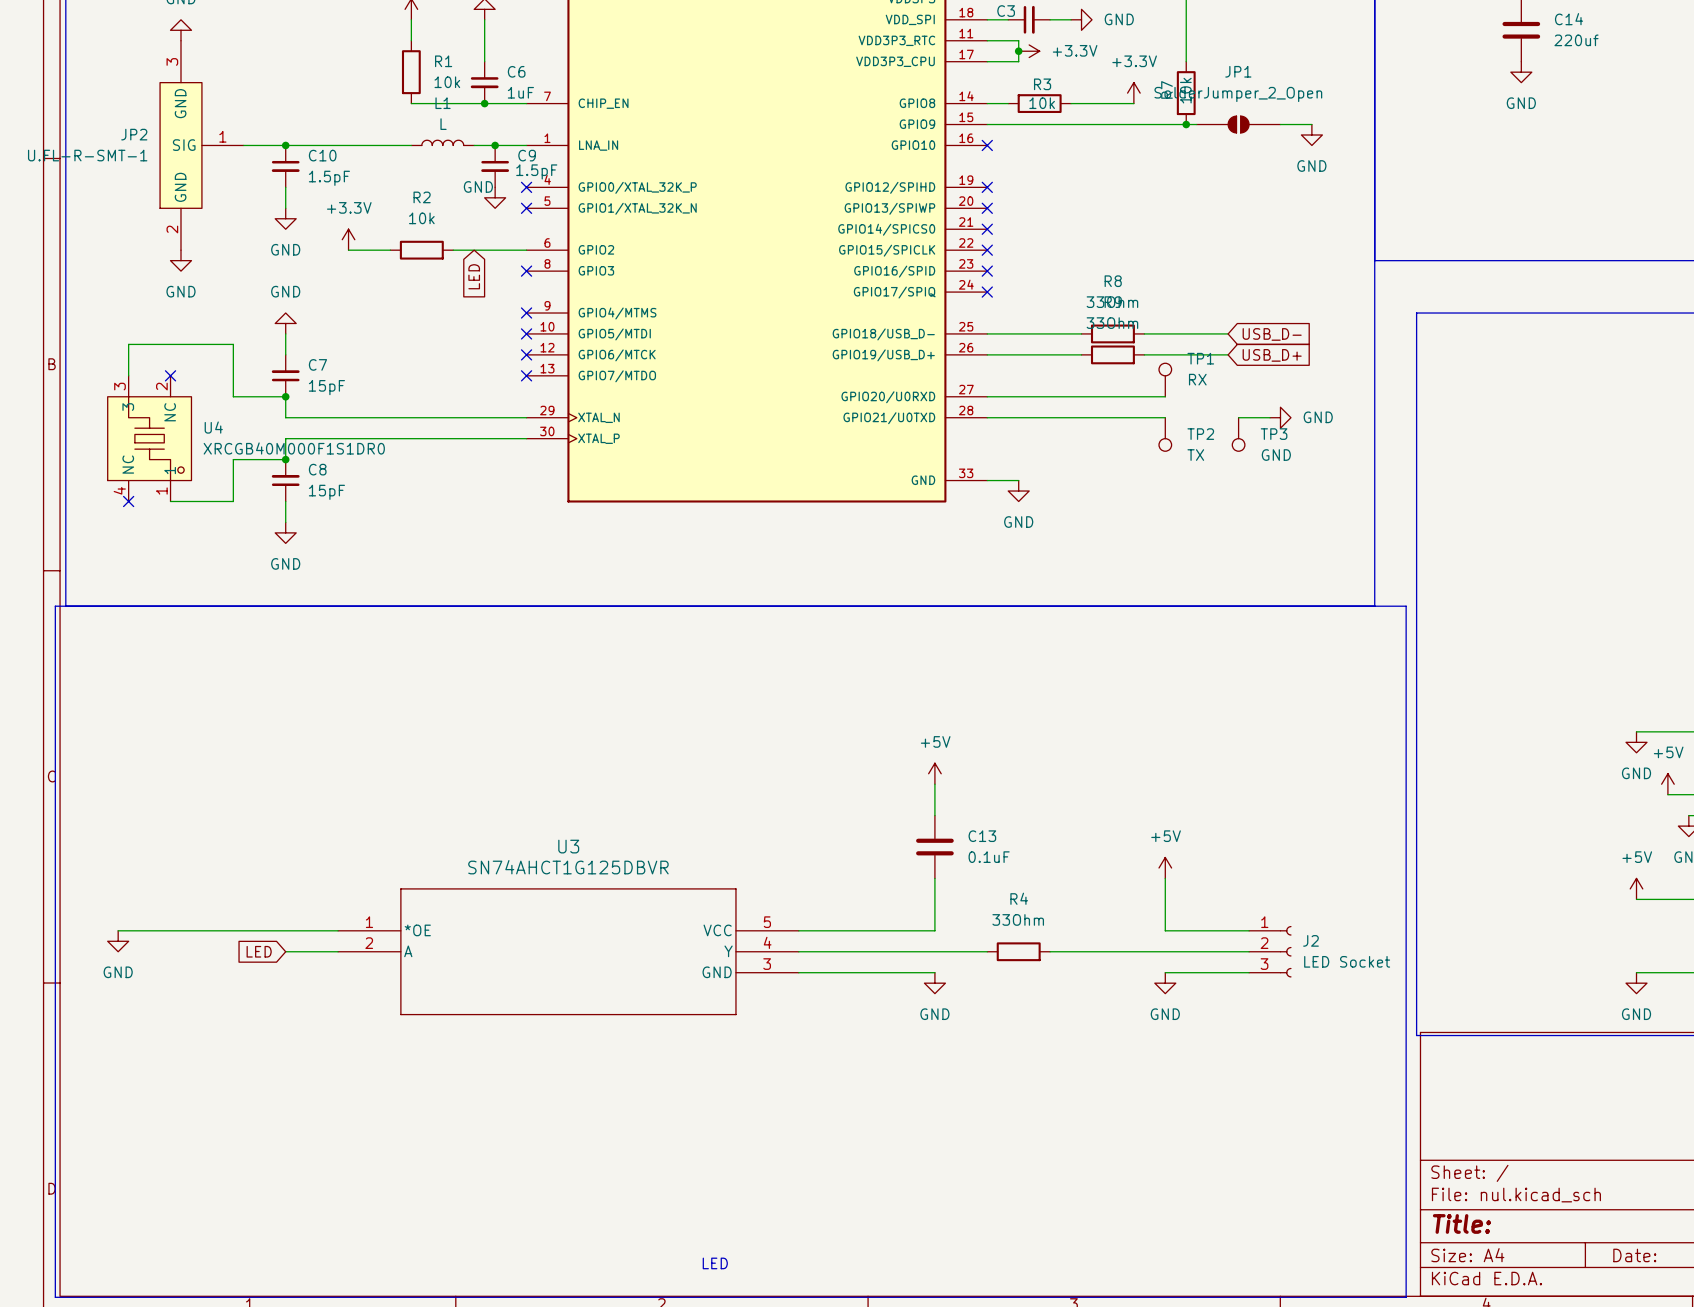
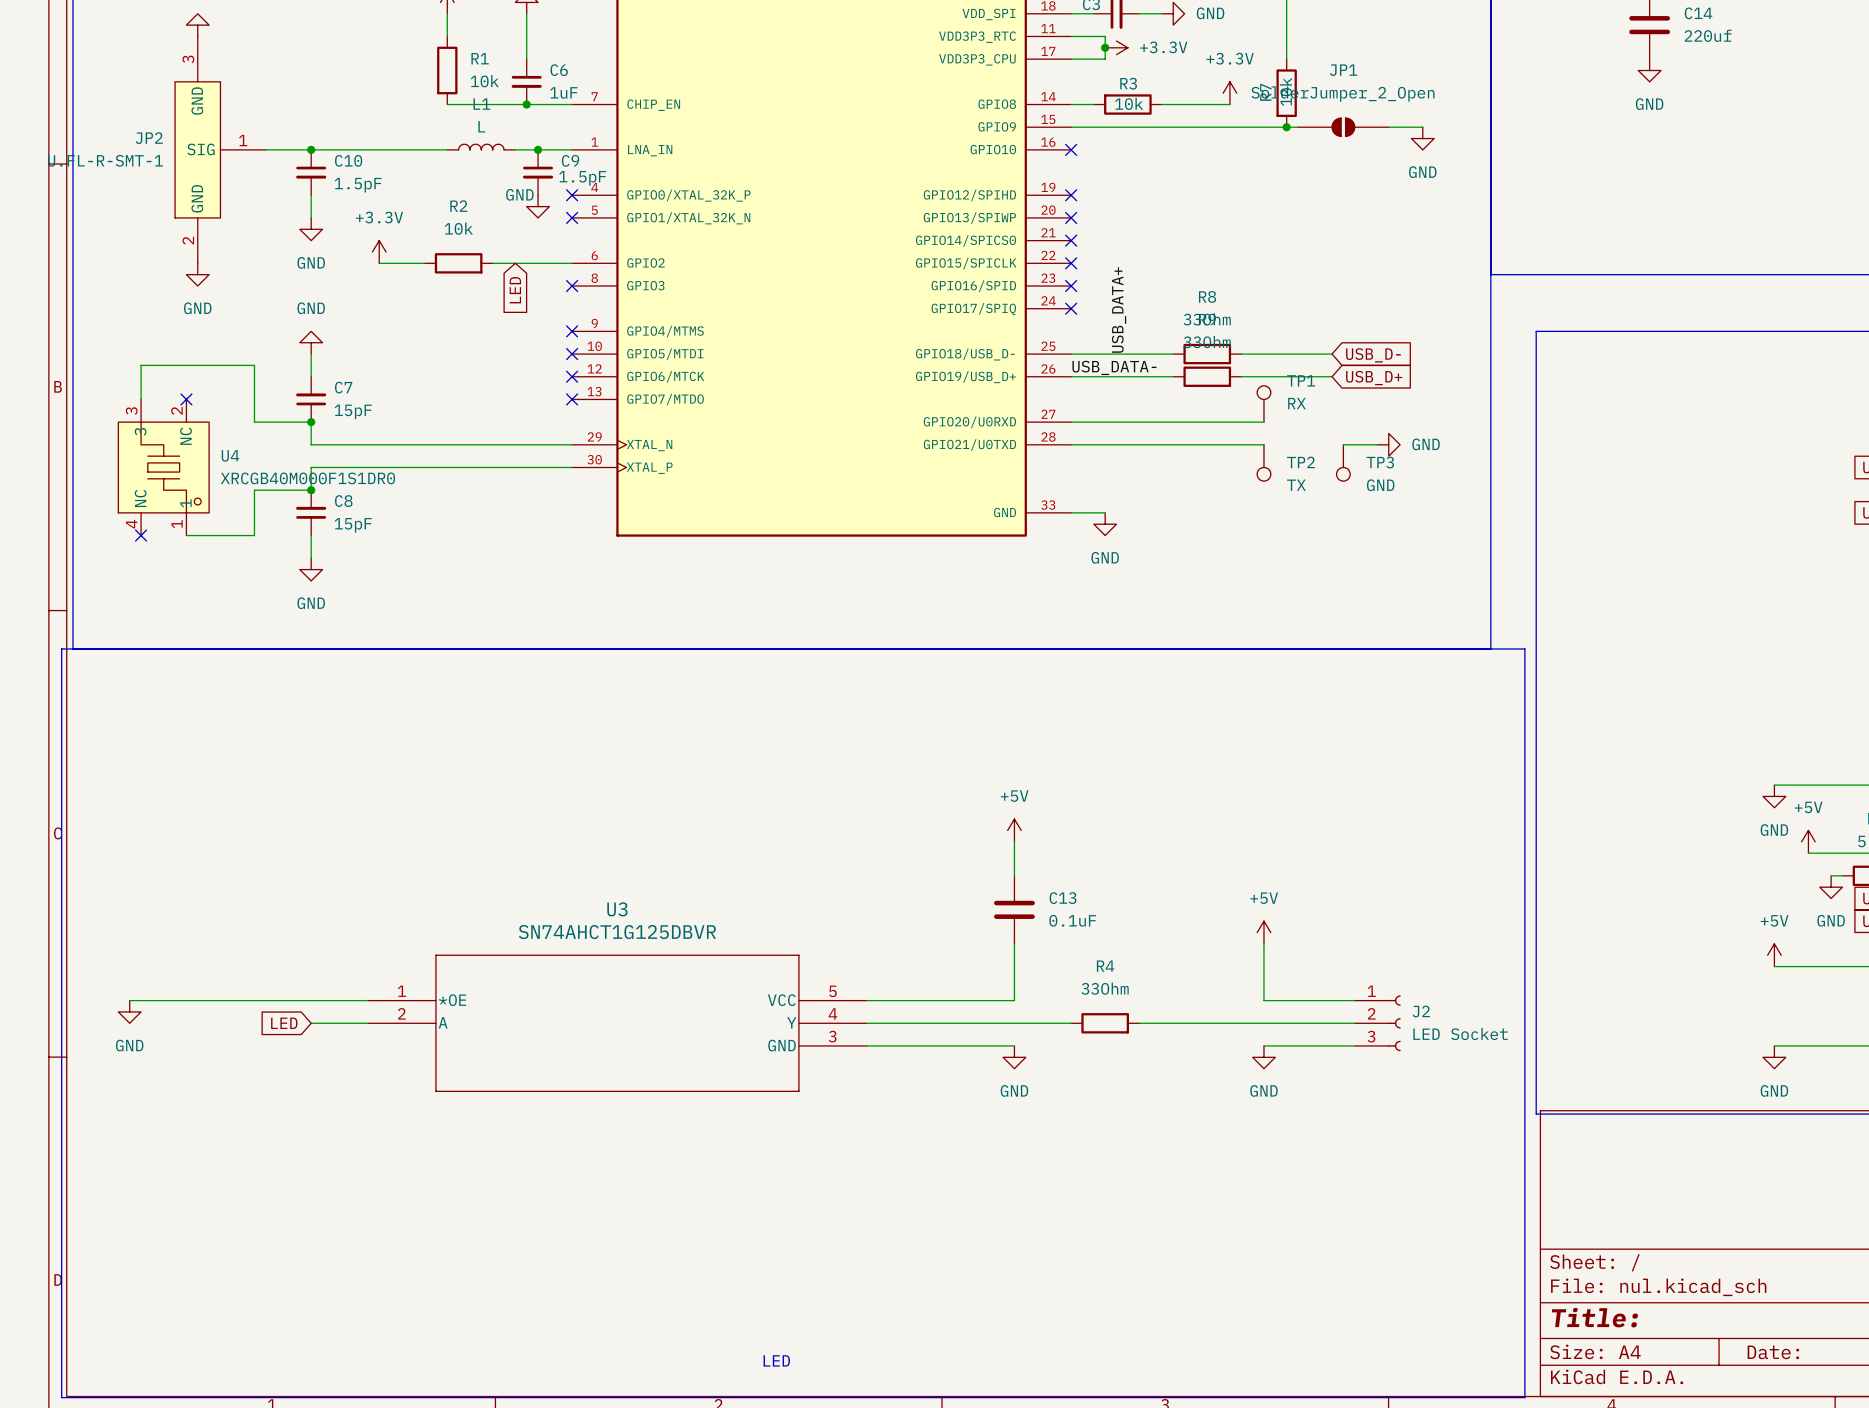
label: none -> USB_DATA+ (1119, 310)
label: none -> USB_DATA- (1114, 367)

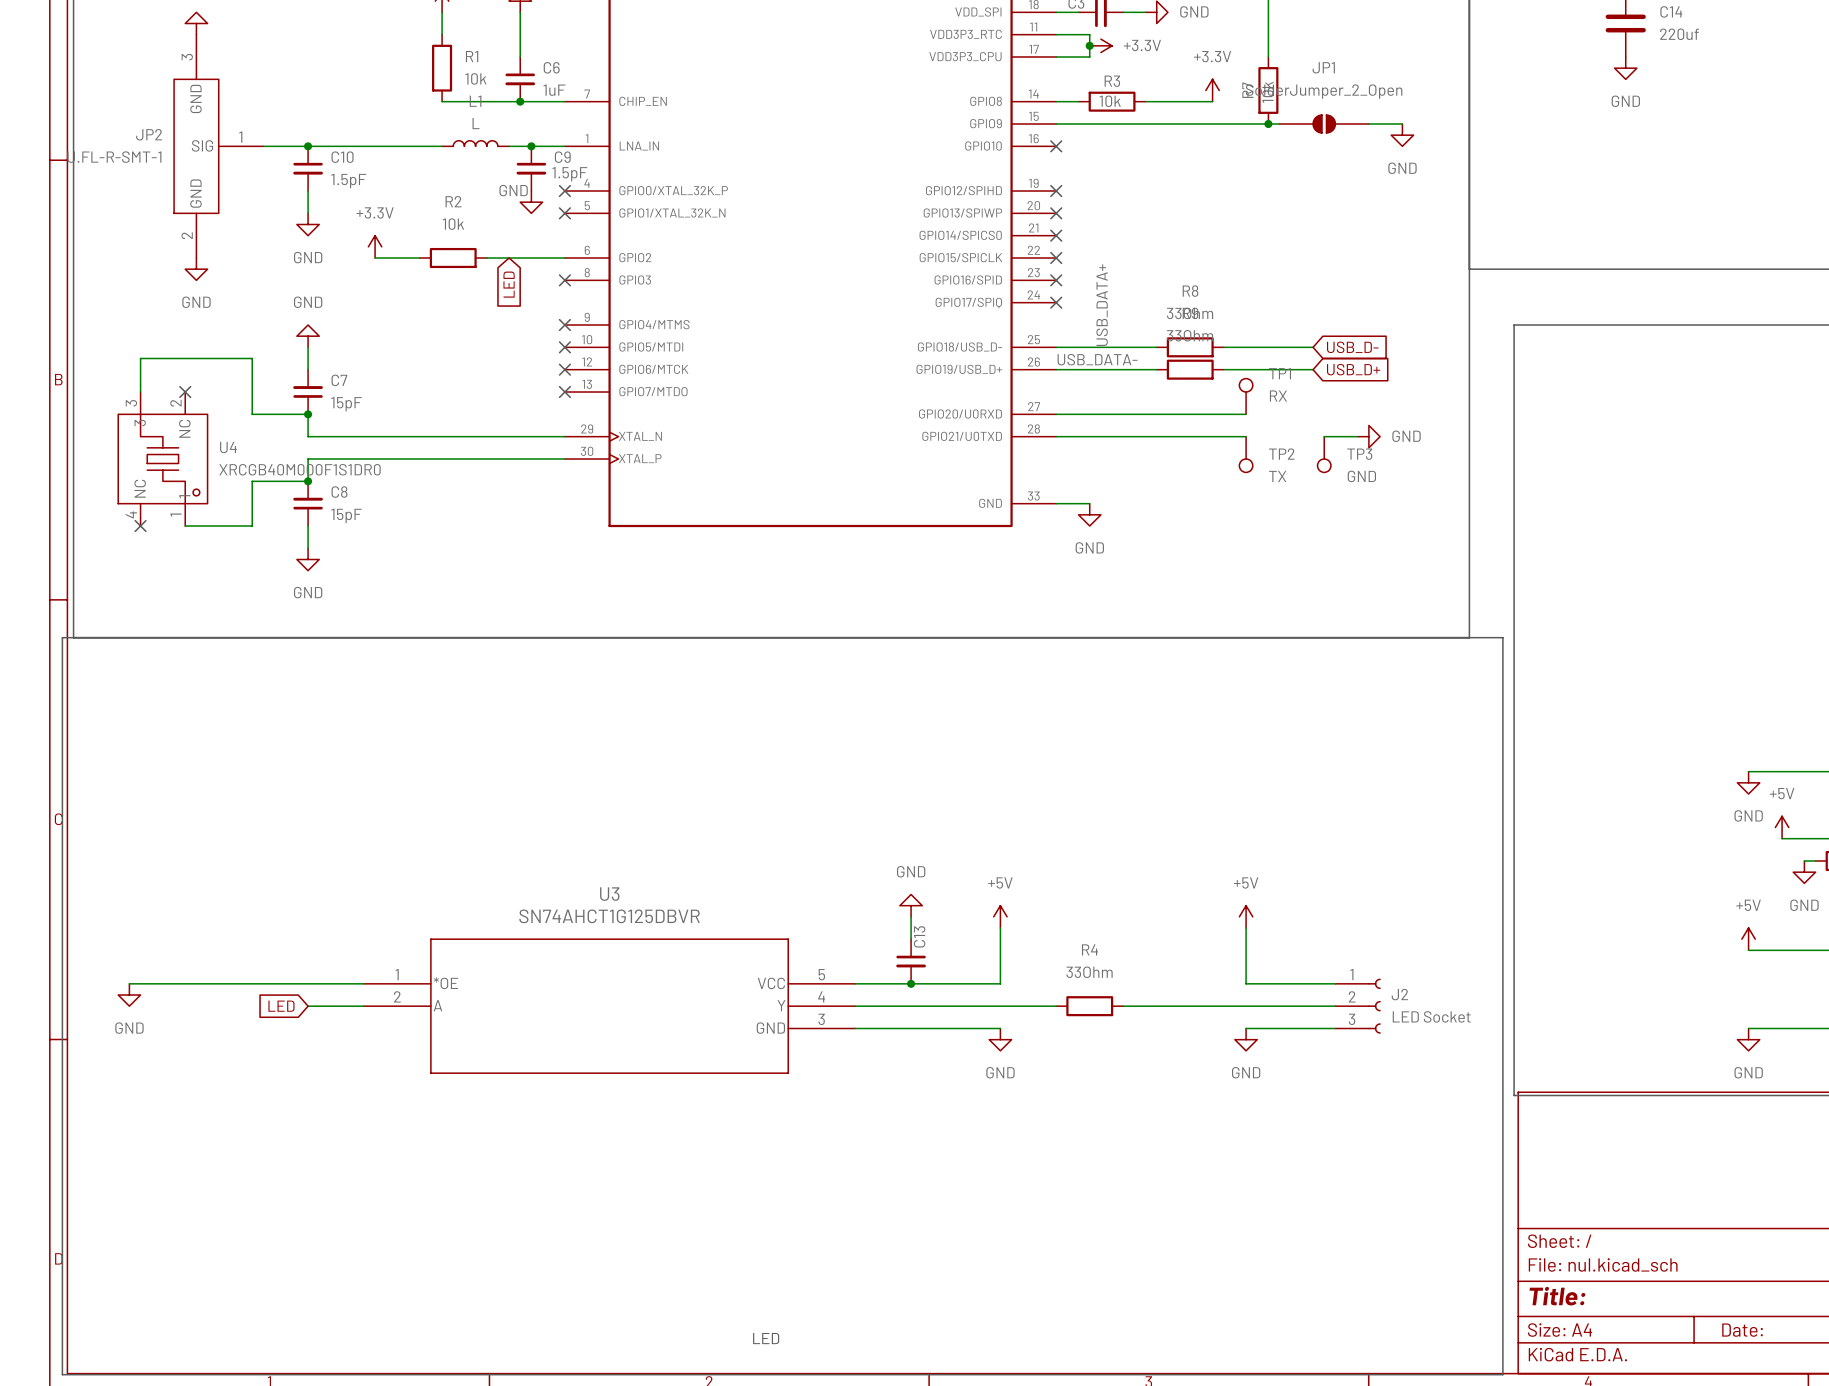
power symbol position: +5V (1014, 830) -> +5V (1000, 916)
wire: (1014, 841) (1014, 875) -> none
C13 symbol: [994, 875, 1035, 944] -> [896, 939, 926, 984]
C13 name position: C13 (1062, 898) -> C13 (919, 936)
C13 value: 0.1uF (1072, 920) -> none
power symbol: none -> GND (911, 905)
wire: none -> (911, 916) (911, 939)
junction: none -> (911, 983)

